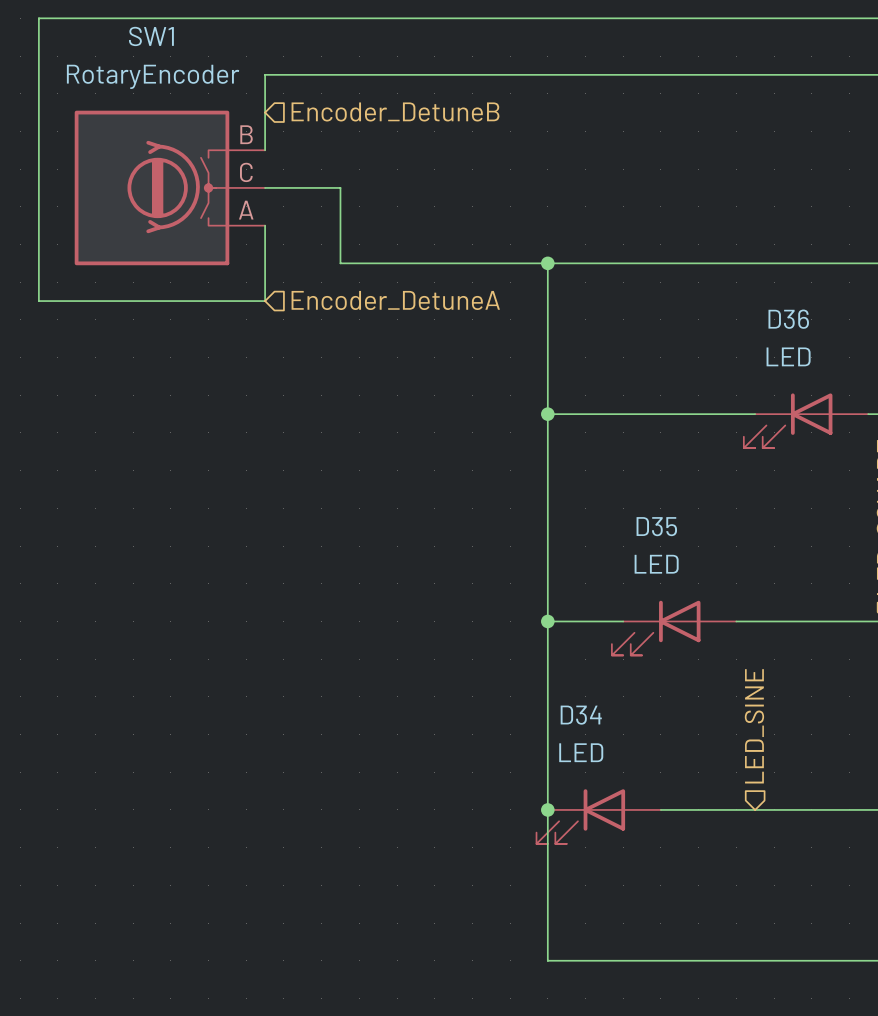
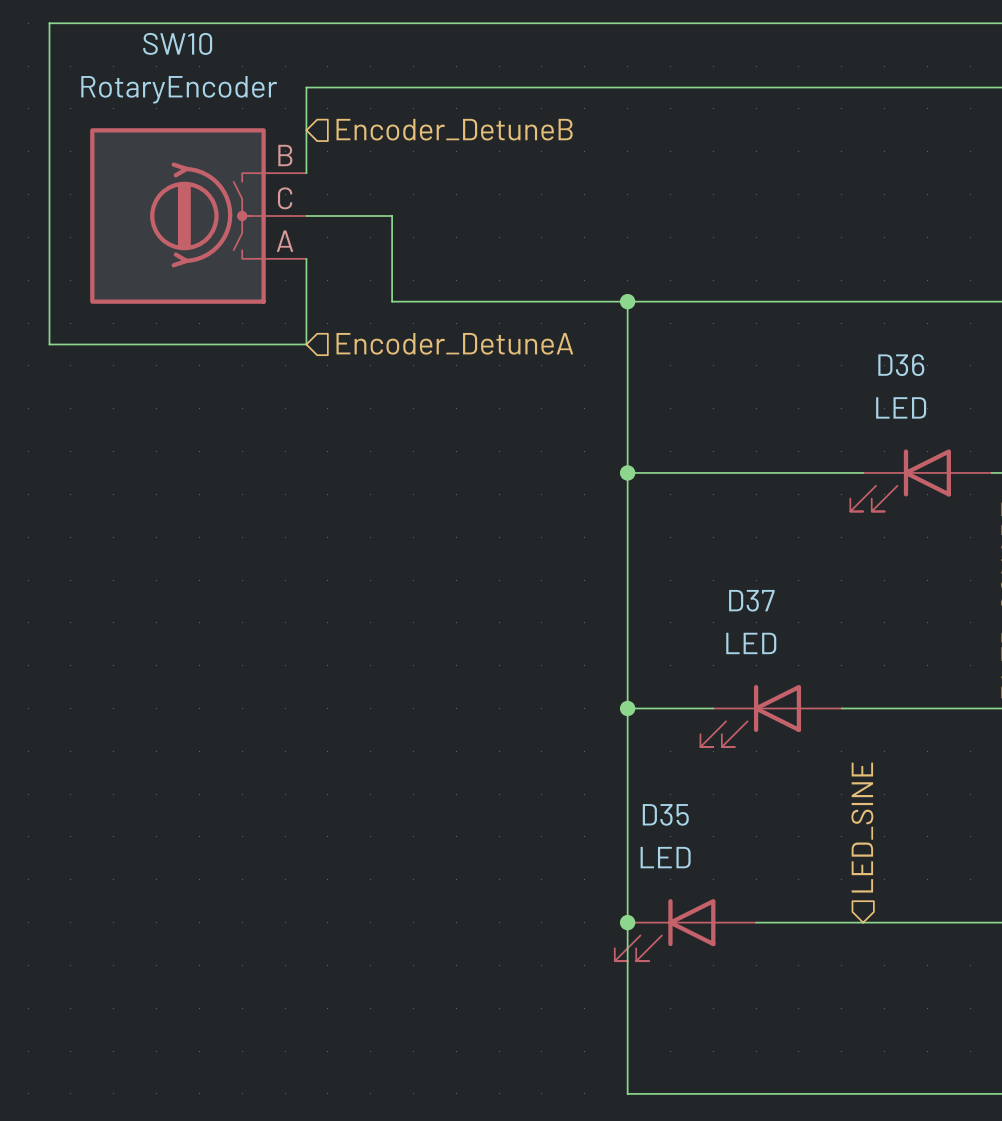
SW1 name: SW1 (151, 36) -> SW10 (177, 43)
D35 name: D35 (656, 526) -> D37 (751, 600)
D34 name: D34 (581, 715) -> D35 (665, 814)

